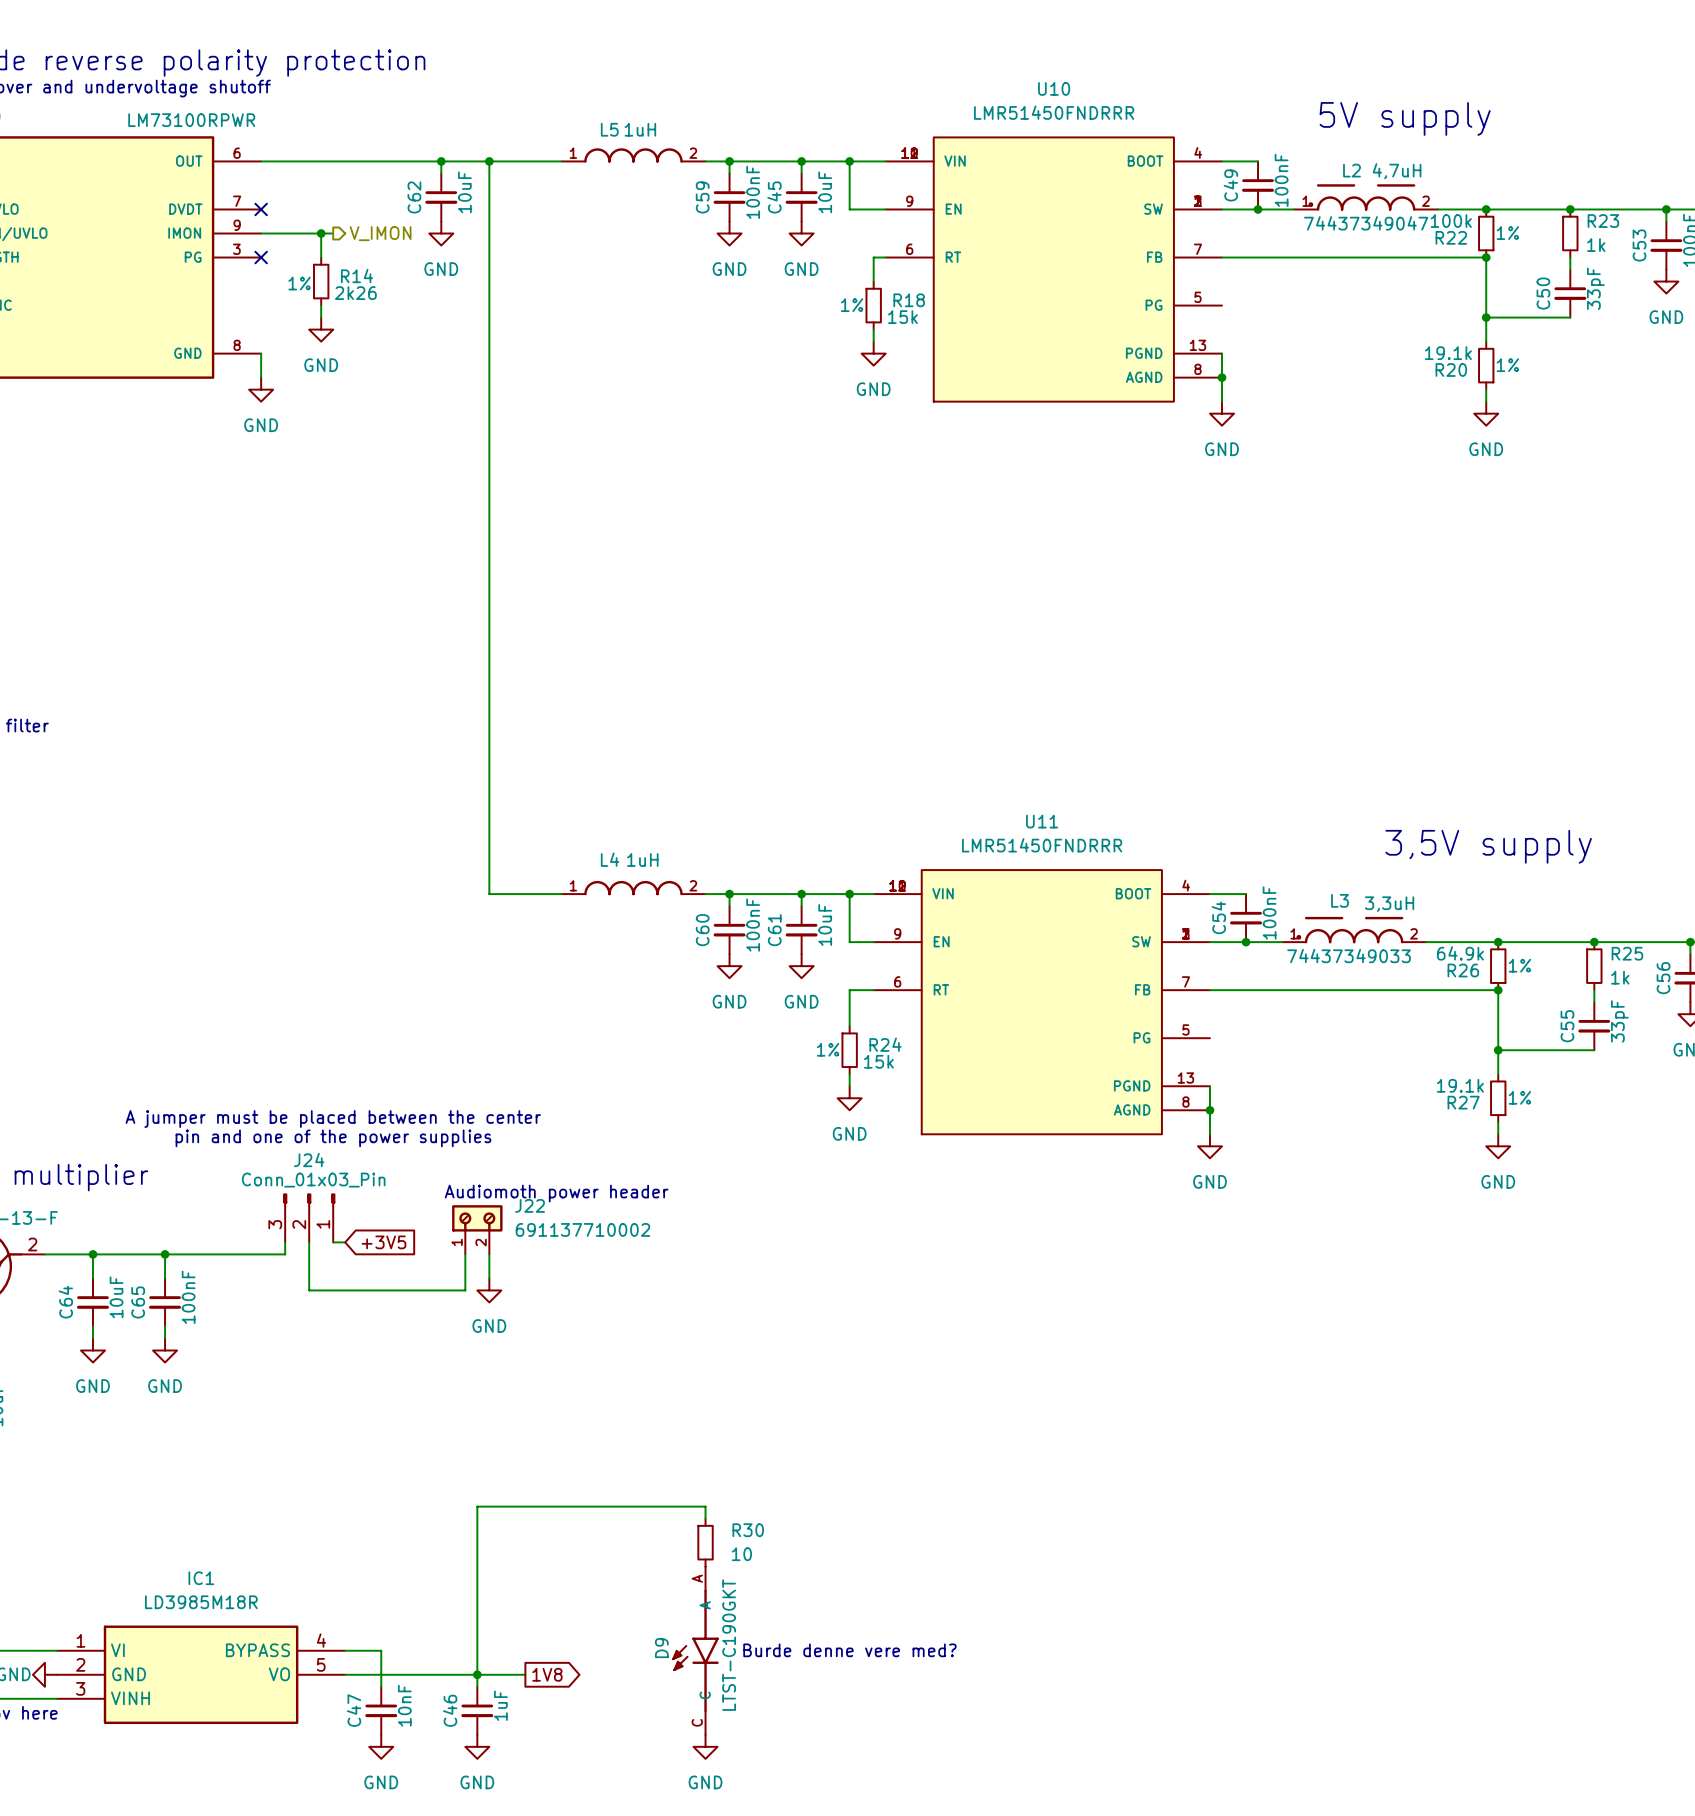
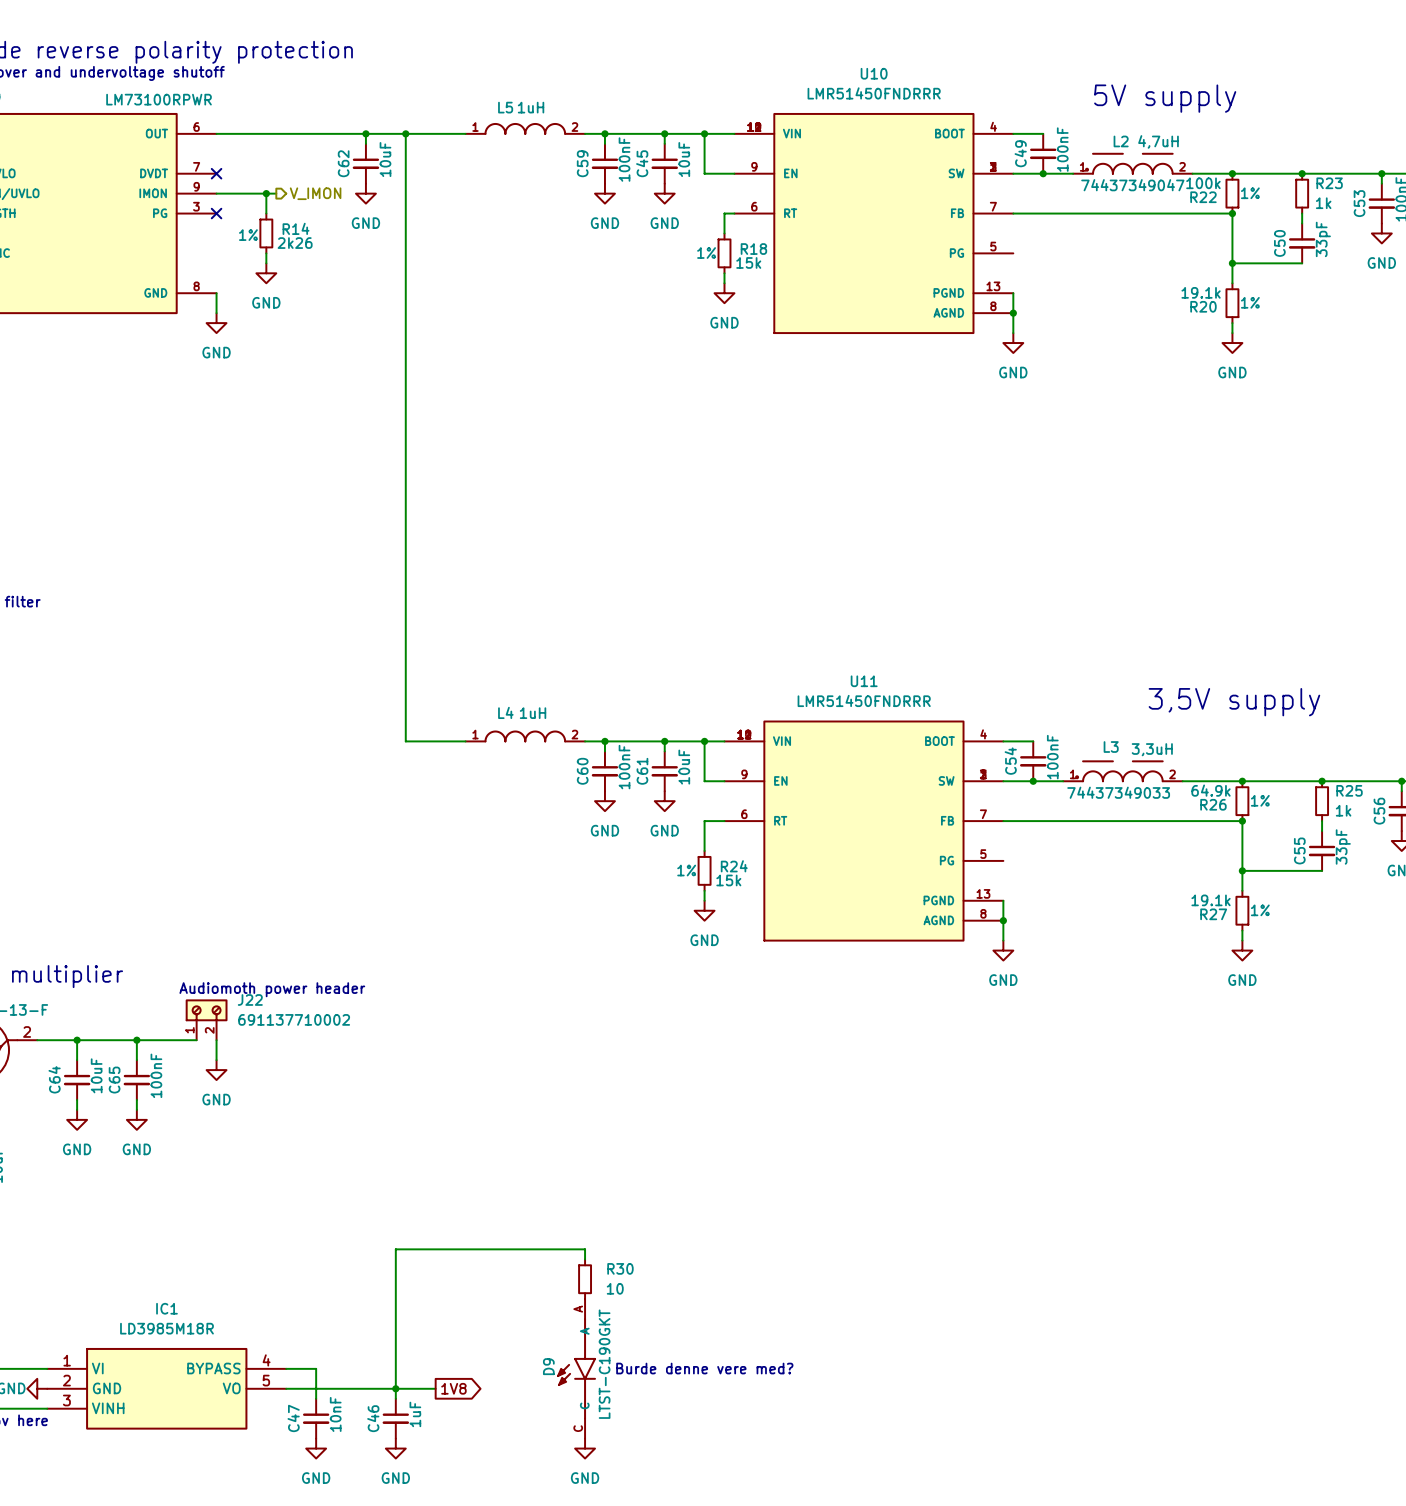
text: A jumper must be placed between the center (333, 1119) -> none
text: pin and one of the power supplies (333, 1138) -> none
text position: Audiomoth power header (556, 1193) -> Audiomoth power header (272, 989)
J24: Conn_01x03_Pin (309, 1218) -> none
J22 position: (477, 1229) -> (206, 1019)
wire: (285, 1242) (285, 1254) (237, 1254) -> none
wire: (309, 1242) (309, 1290) (465, 1290) (465, 1254) -> none
wire: (333, 1242) (345, 1242) -> none
global label: +3V5 (383, 1242) -> none
wire: (489, 1254) (489, 1278) -> (216, 1040) (216, 1060)
power symbol position: GND (489, 1290) -> GND (216, 1070)

